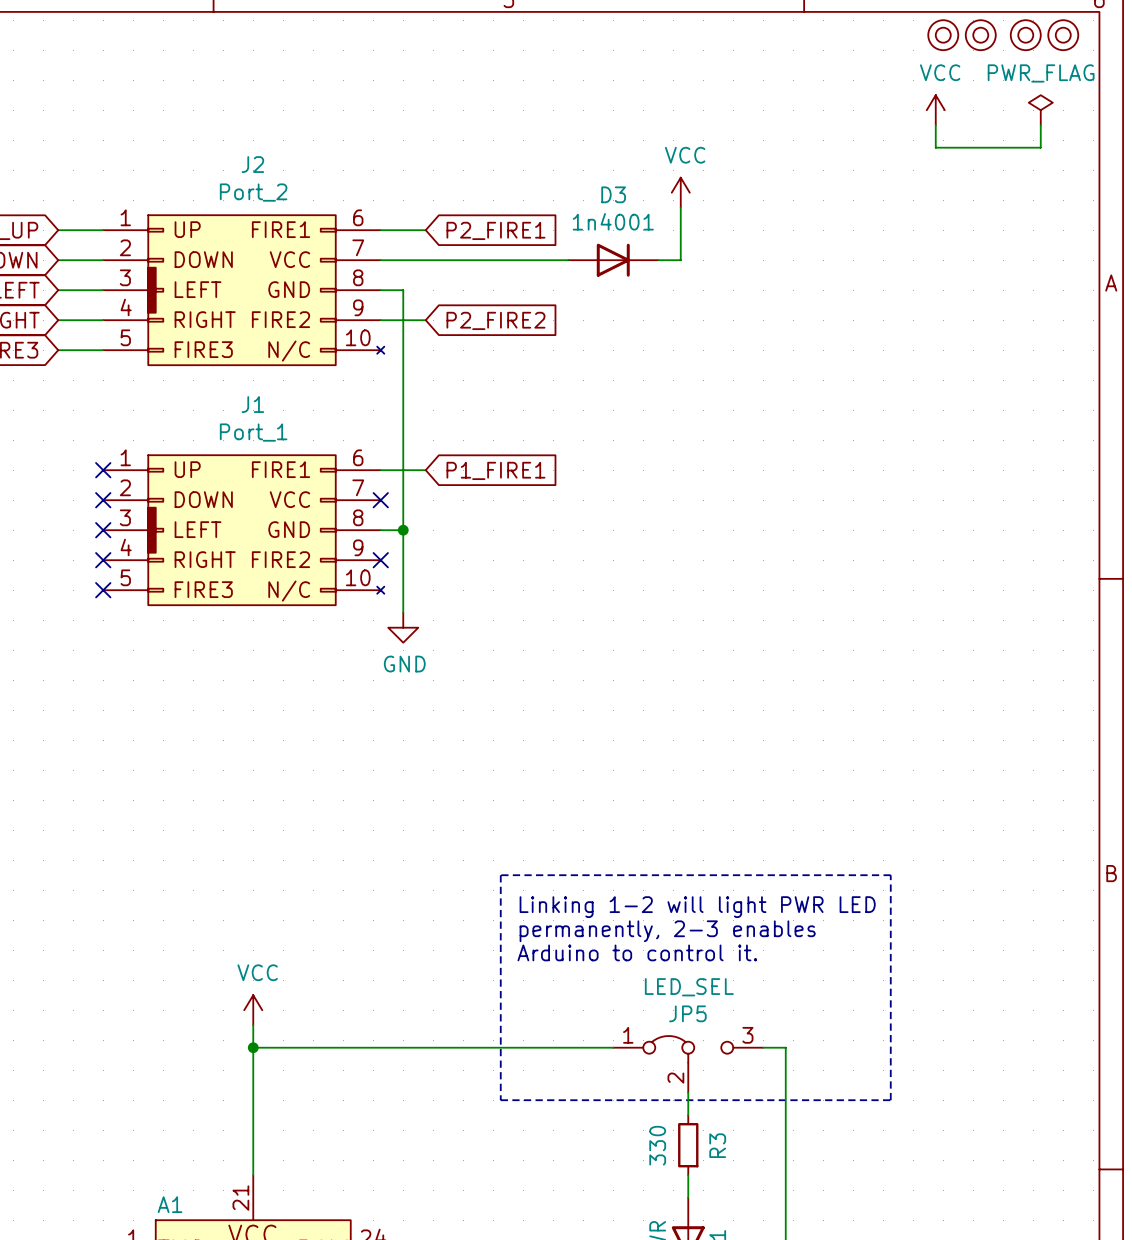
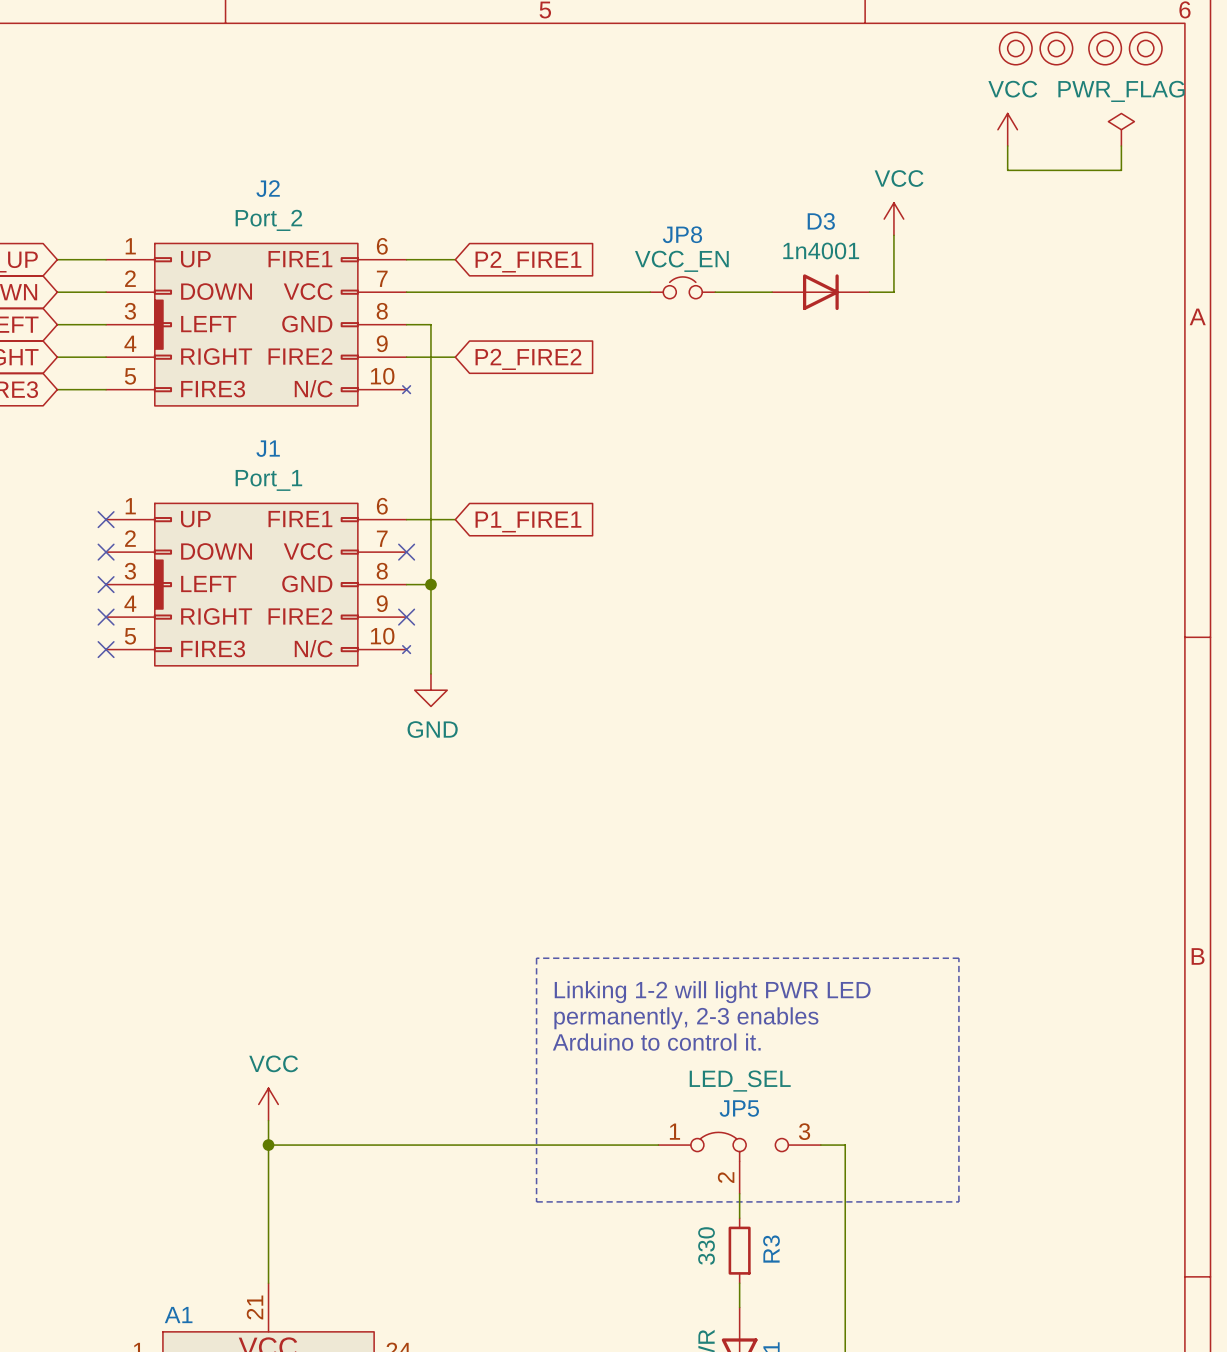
power symbol position: VCC (680, 192) -> VCC (893, 219)
wire: (680, 207) (680, 260) -> (772, 292) (731, 292)
wire: none -> (893, 235) (893, 292) (869, 292)
JP8: none -> VCC_EN (682, 287)
D3 position: (613, 260) -> (820, 292)

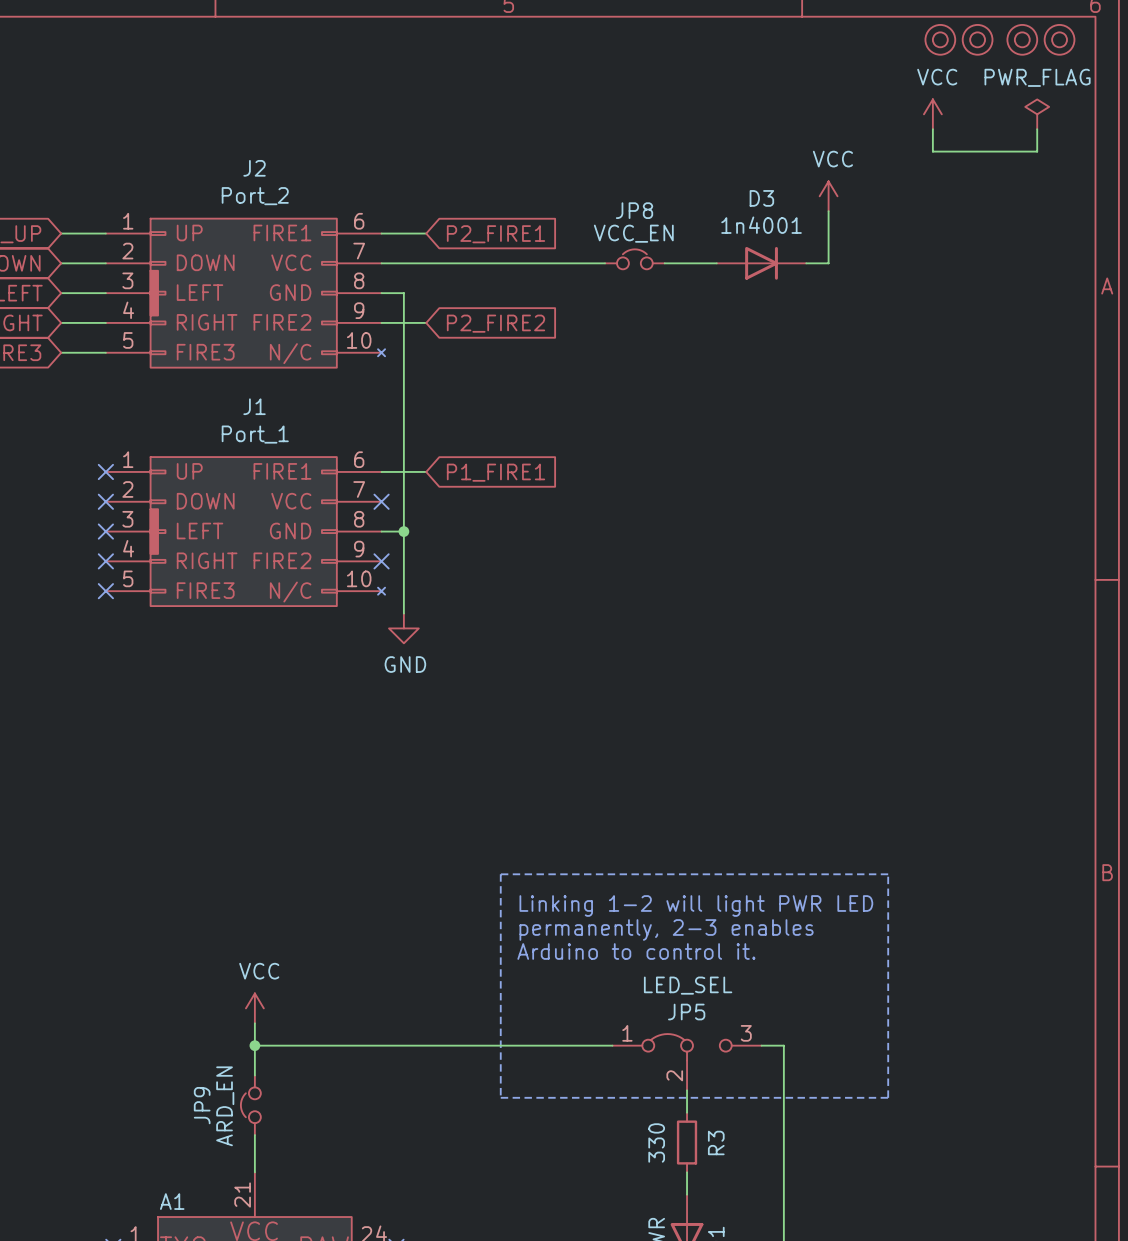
wire: (268, 1177) (268, 1242) -> none
JP9: none -> ARD_EN (250, 1105)

